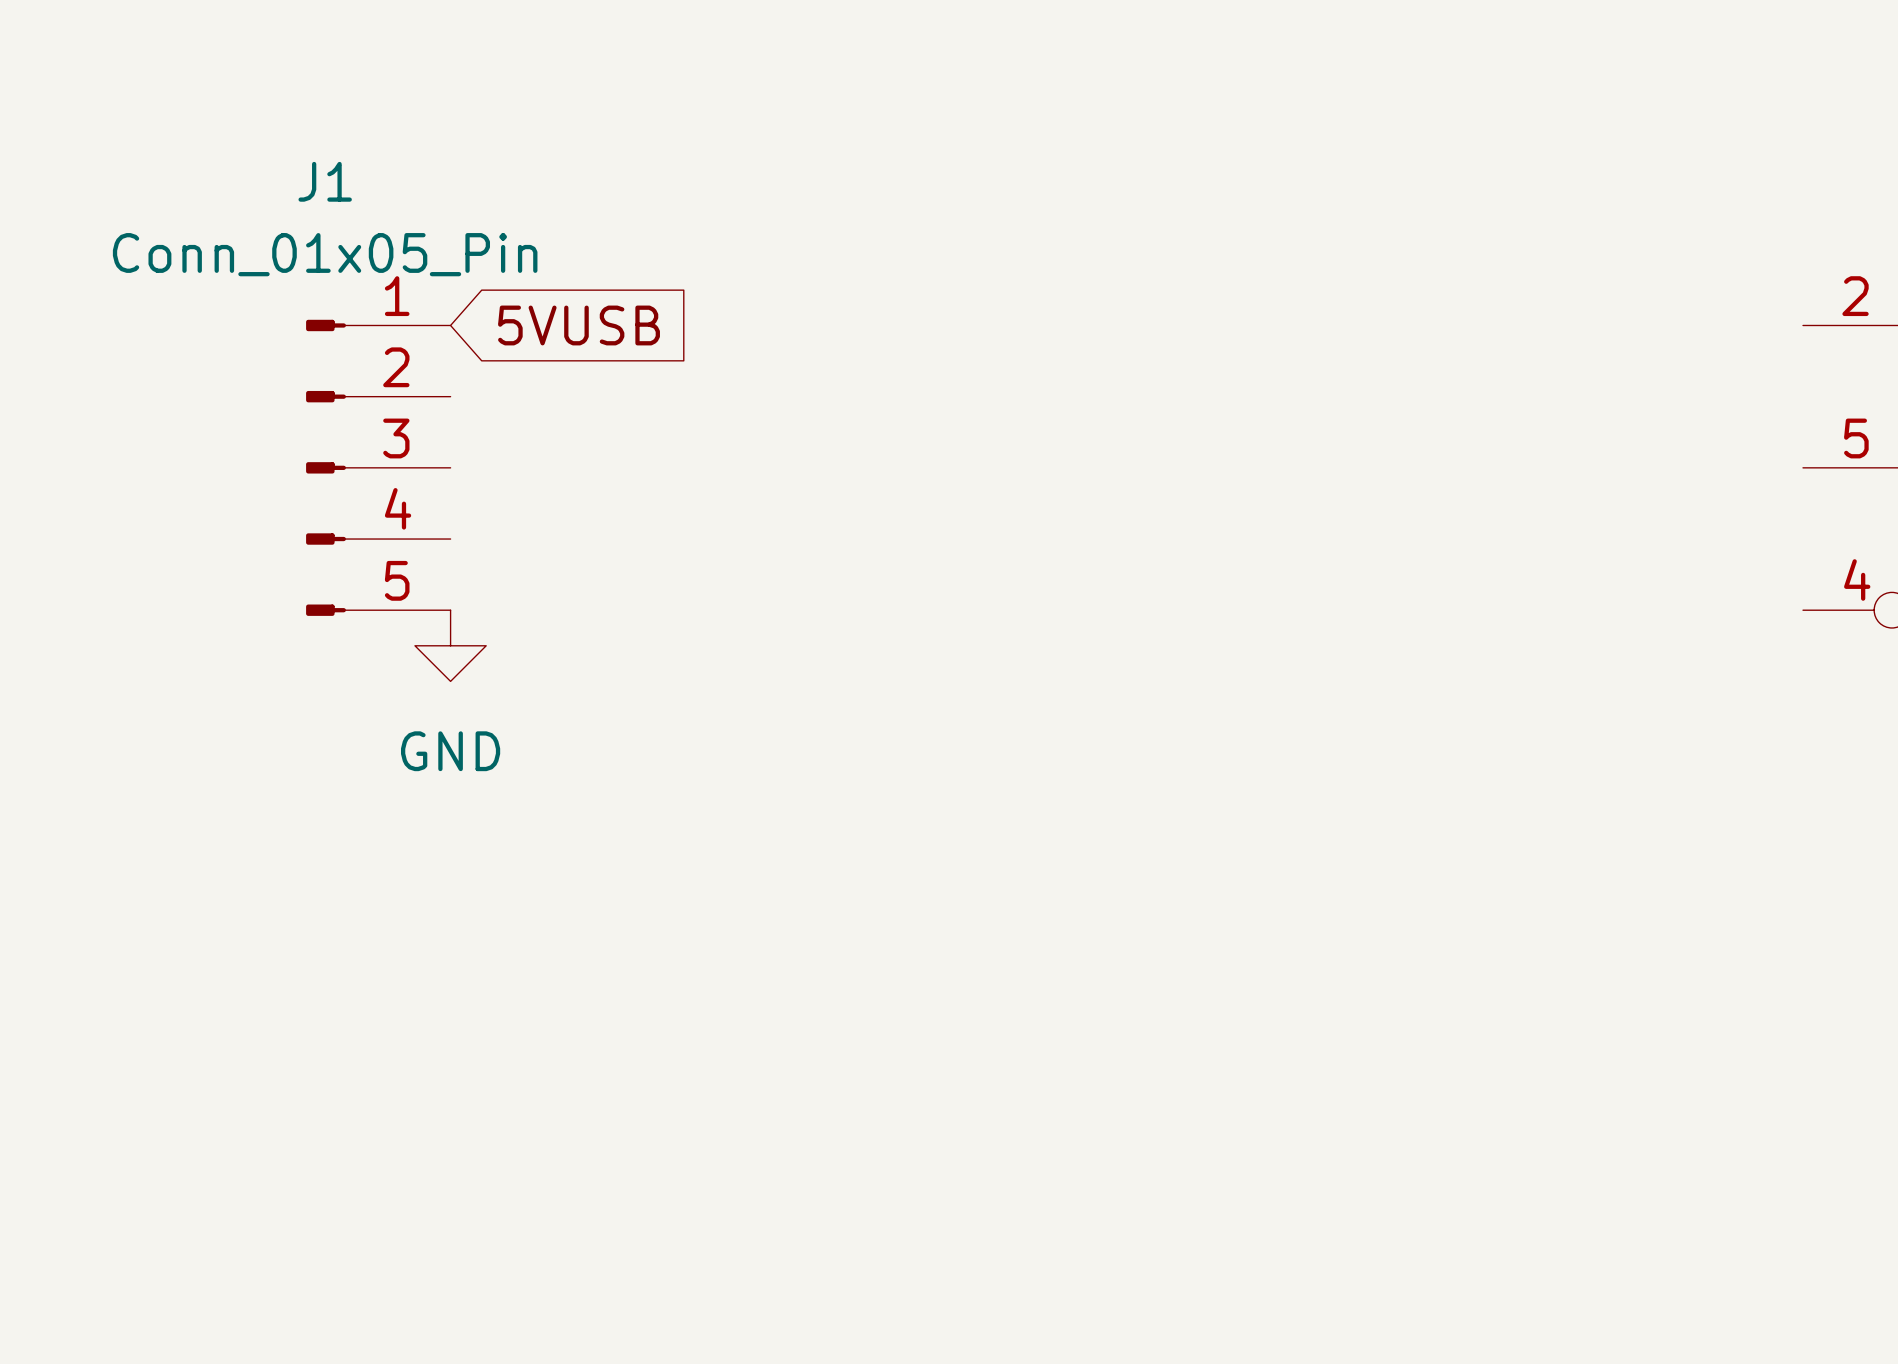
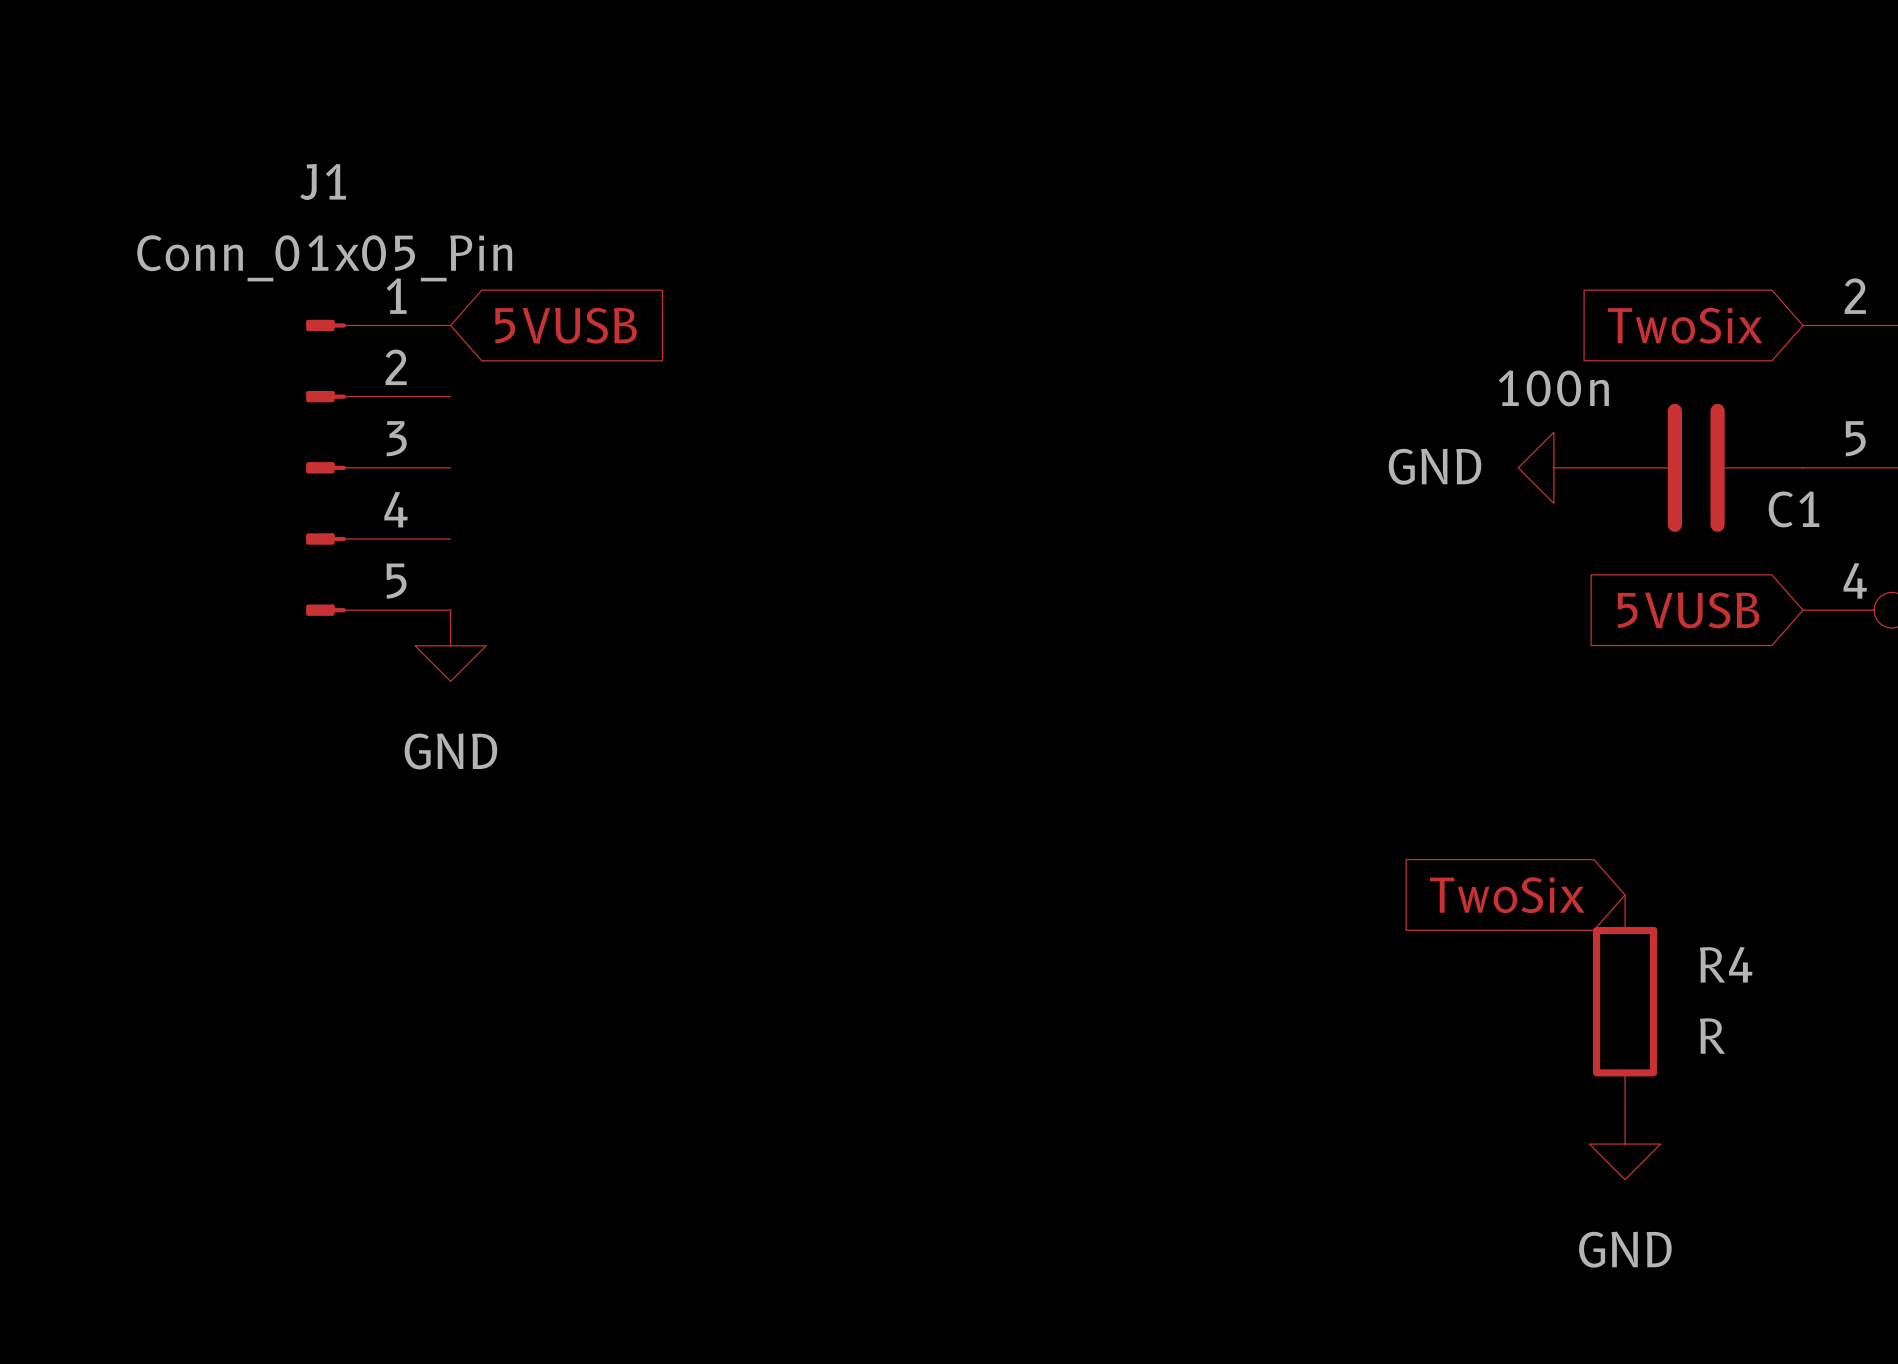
global label: none -> TwoSix (1685, 325)
power symbol: none -> GND (1553, 467)
C1: none -> 100n (1696, 467)
global label: none -> 5VUSB (1688, 610)
global label: none -> TwoSix (1507, 895)
R4: none -> R (1625, 1001)
power symbol: none -> GND (1625, 1144)

